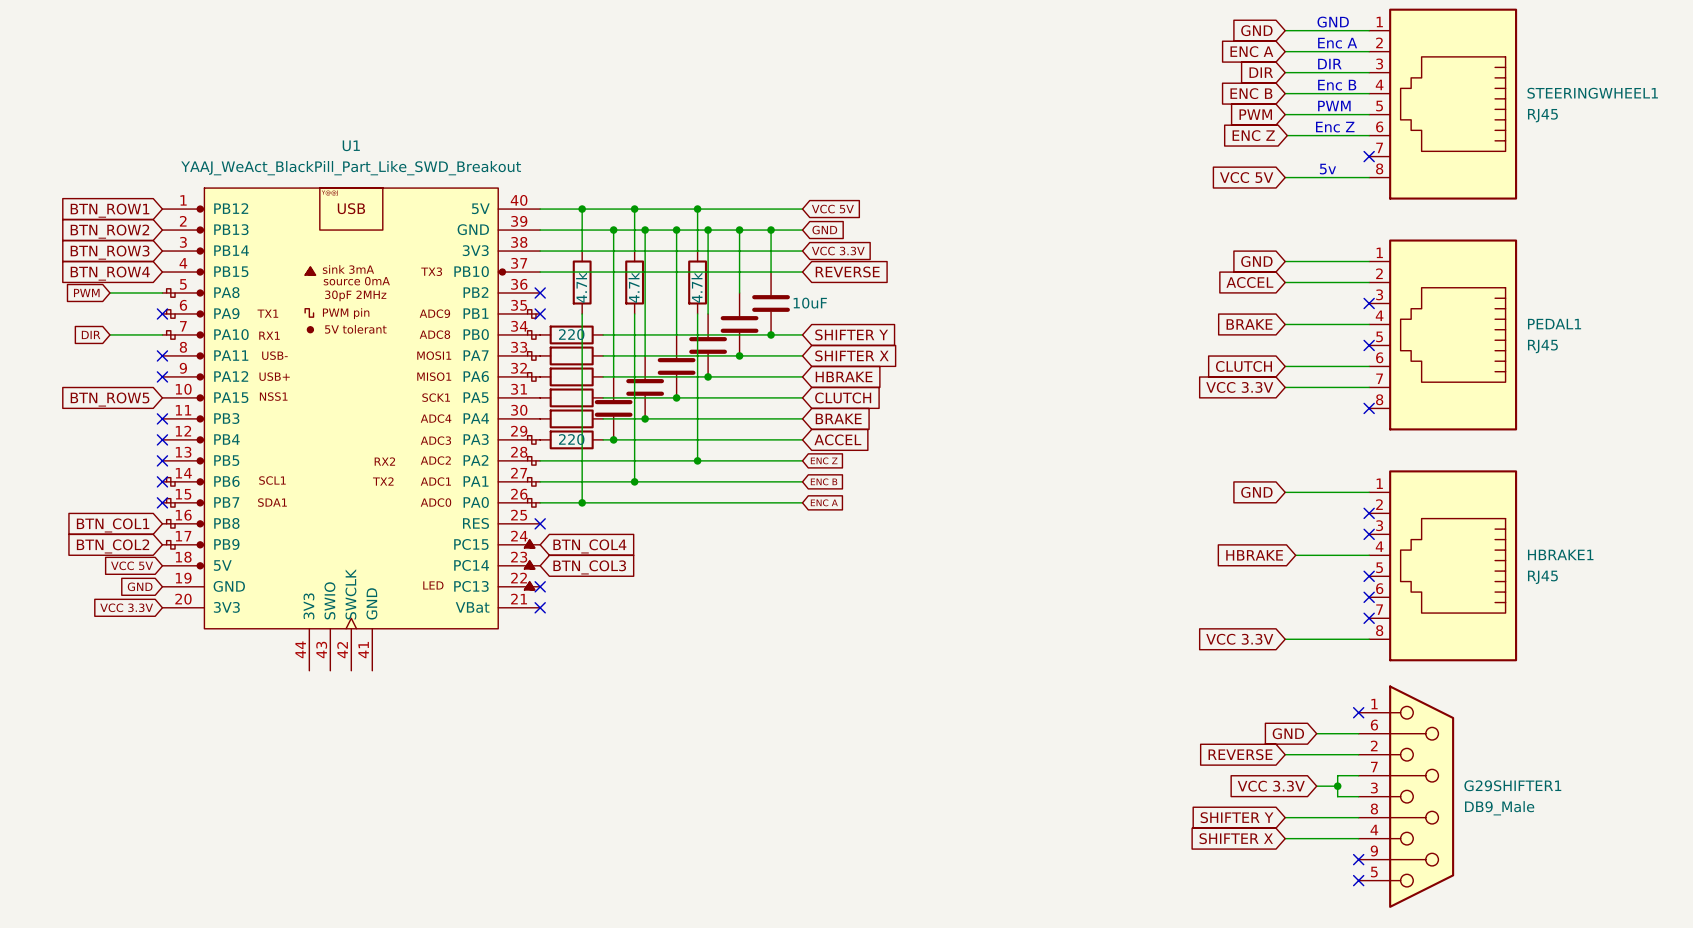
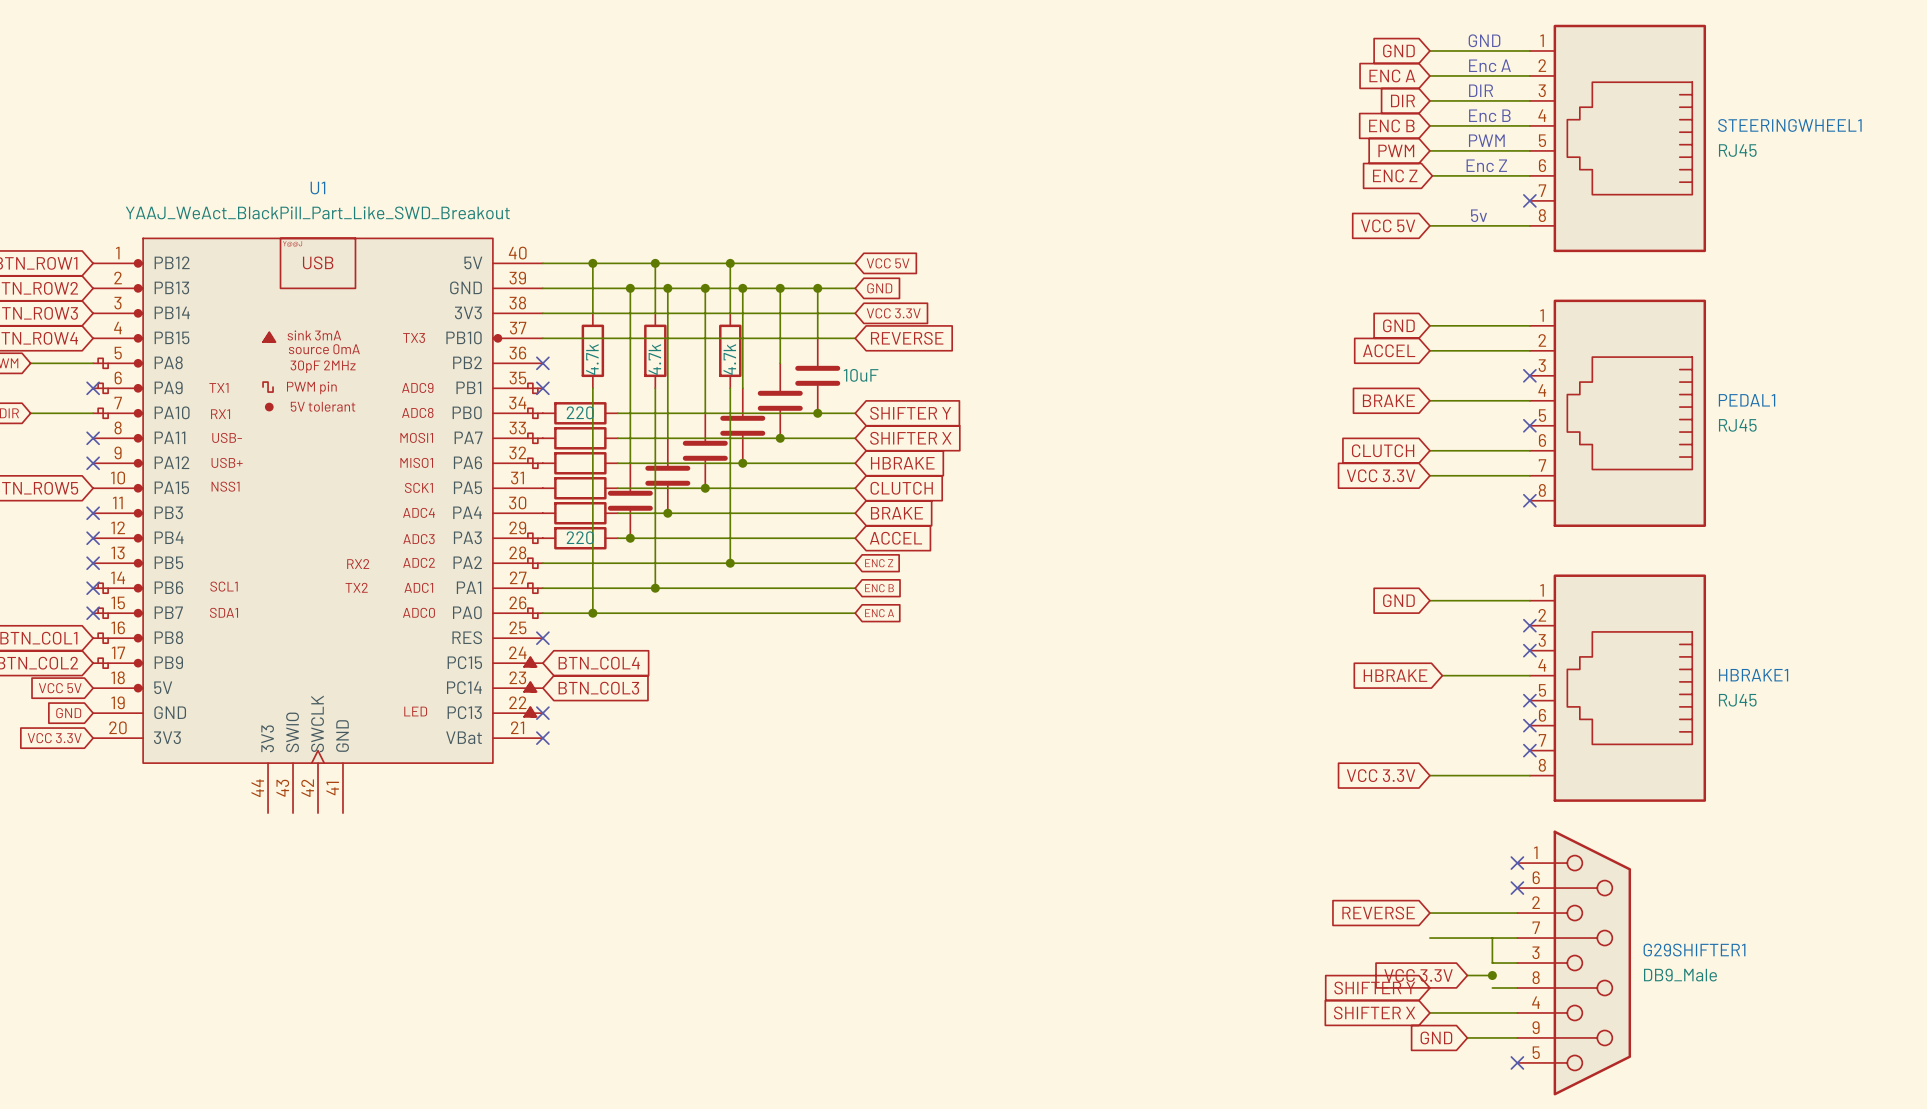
global label position: GND (1288, 733) -> GND (1436, 1037)
wire: (1316, 733) (1358, 733) -> (1467, 1037) (1517, 1037)
no-connect mark: none -> (1517, 888)
global label position: VCC 3.3V (1271, 786) -> VCC 3.3V (1418, 975)
wire: (1316, 786) (1337, 786) -> (1467, 975) (1492, 975)
junction position: (1337, 786) -> (1492, 975)
wire: (1285, 817) (1337, 817) -> (1429, 938) (1492, 938)
no-connect mark: (1358, 859) -> none

